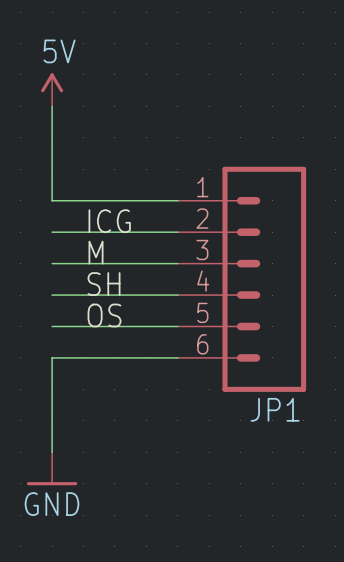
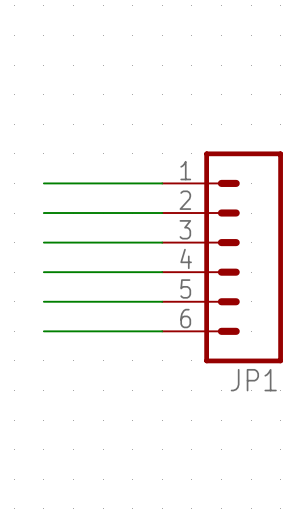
power symbol: 5V (52, 89) -> none
wire: (52, 106) (52, 200) -> none
label: ICG (109, 221) -> none
label: M (96, 252) -> none
label: SH (104, 284) -> none
label: OS (104, 315) -> none
wire: (52, 357) (52, 452) -> none
power symbol: GND (52, 468) -> none

